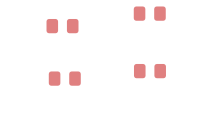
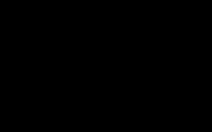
part: (149, 13) -> none
part: (62, 26) -> none
part: (149, 71) -> none
part: (64, 78) -> none

